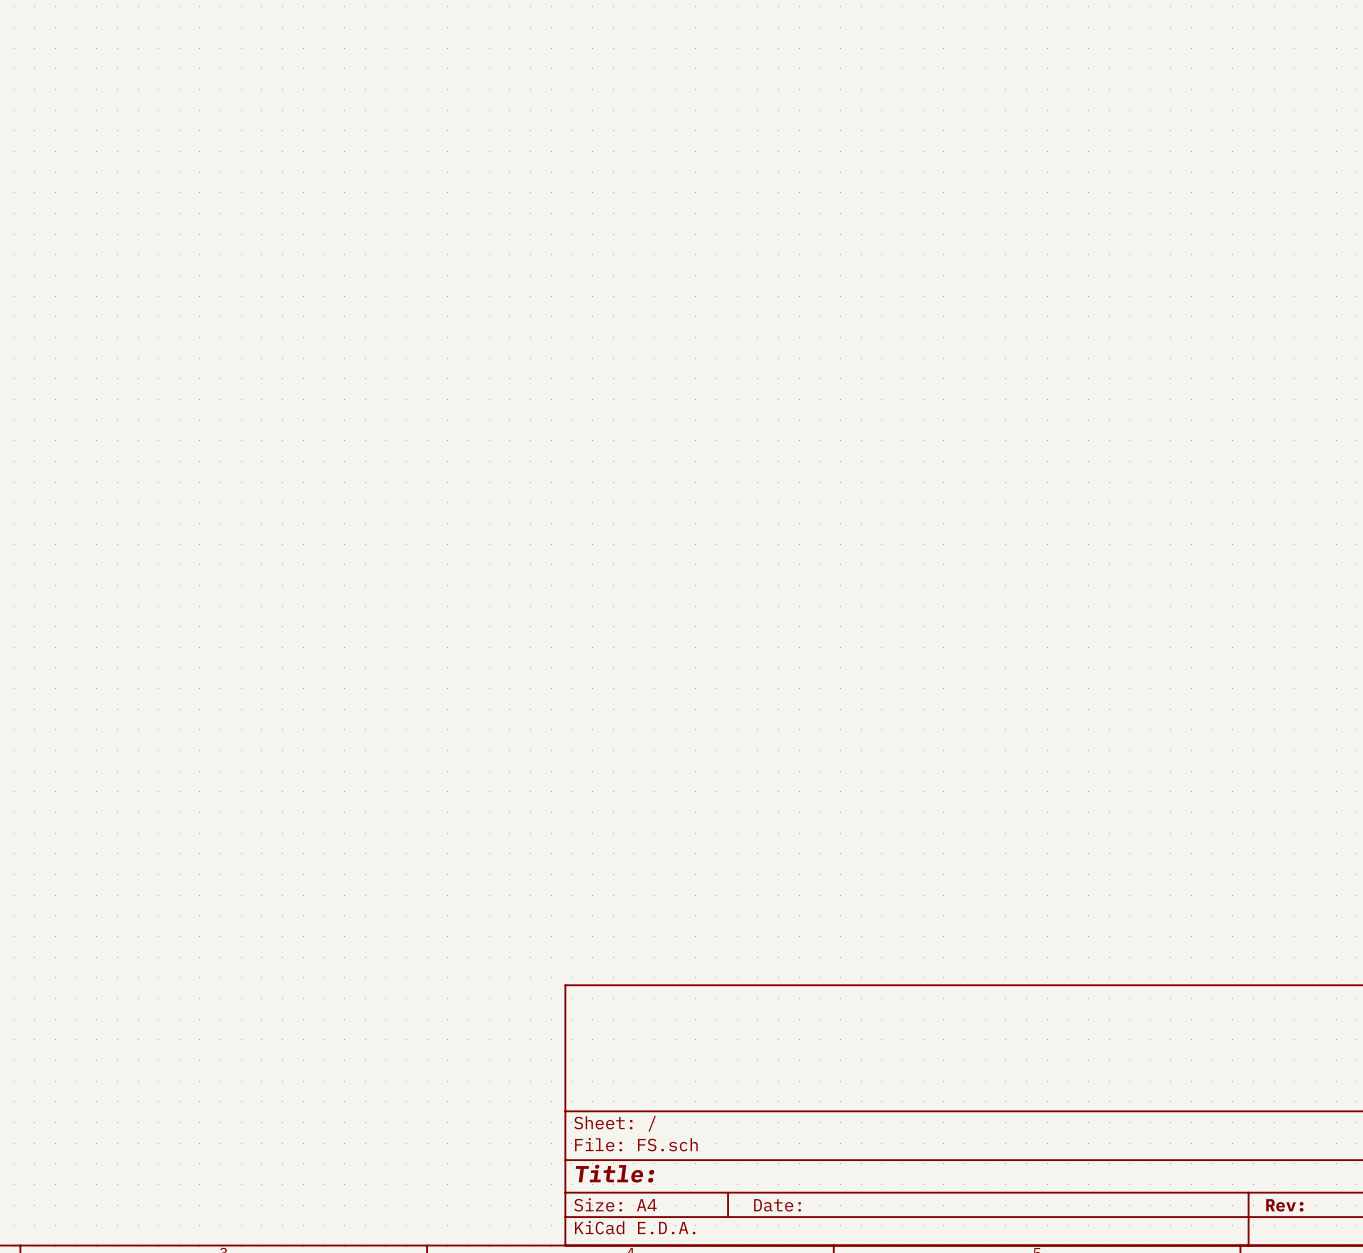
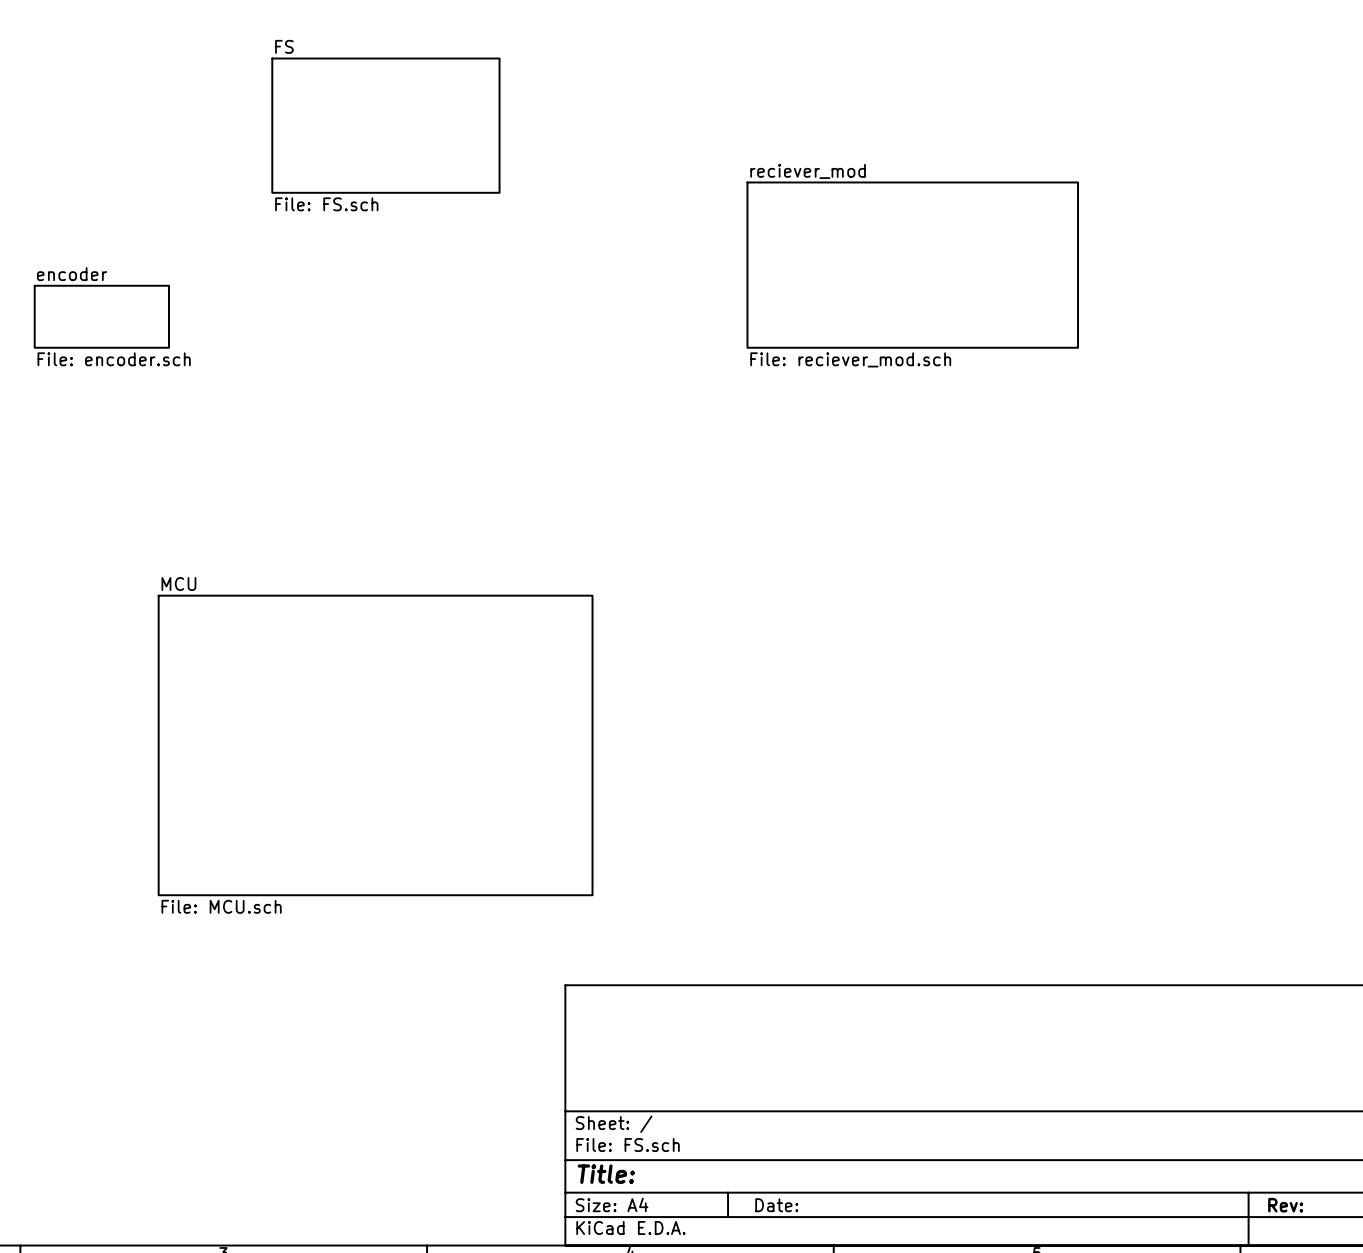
sheet FS: none -> File: FS.sch (385, 125)
sheet reciever_mod: none -> File: reciever_mod.sch (912, 265)
sheet encoder: none -> File: encoder.sch (101, 316)
sheet MCU: none -> File: MCU.sch (375, 745)

